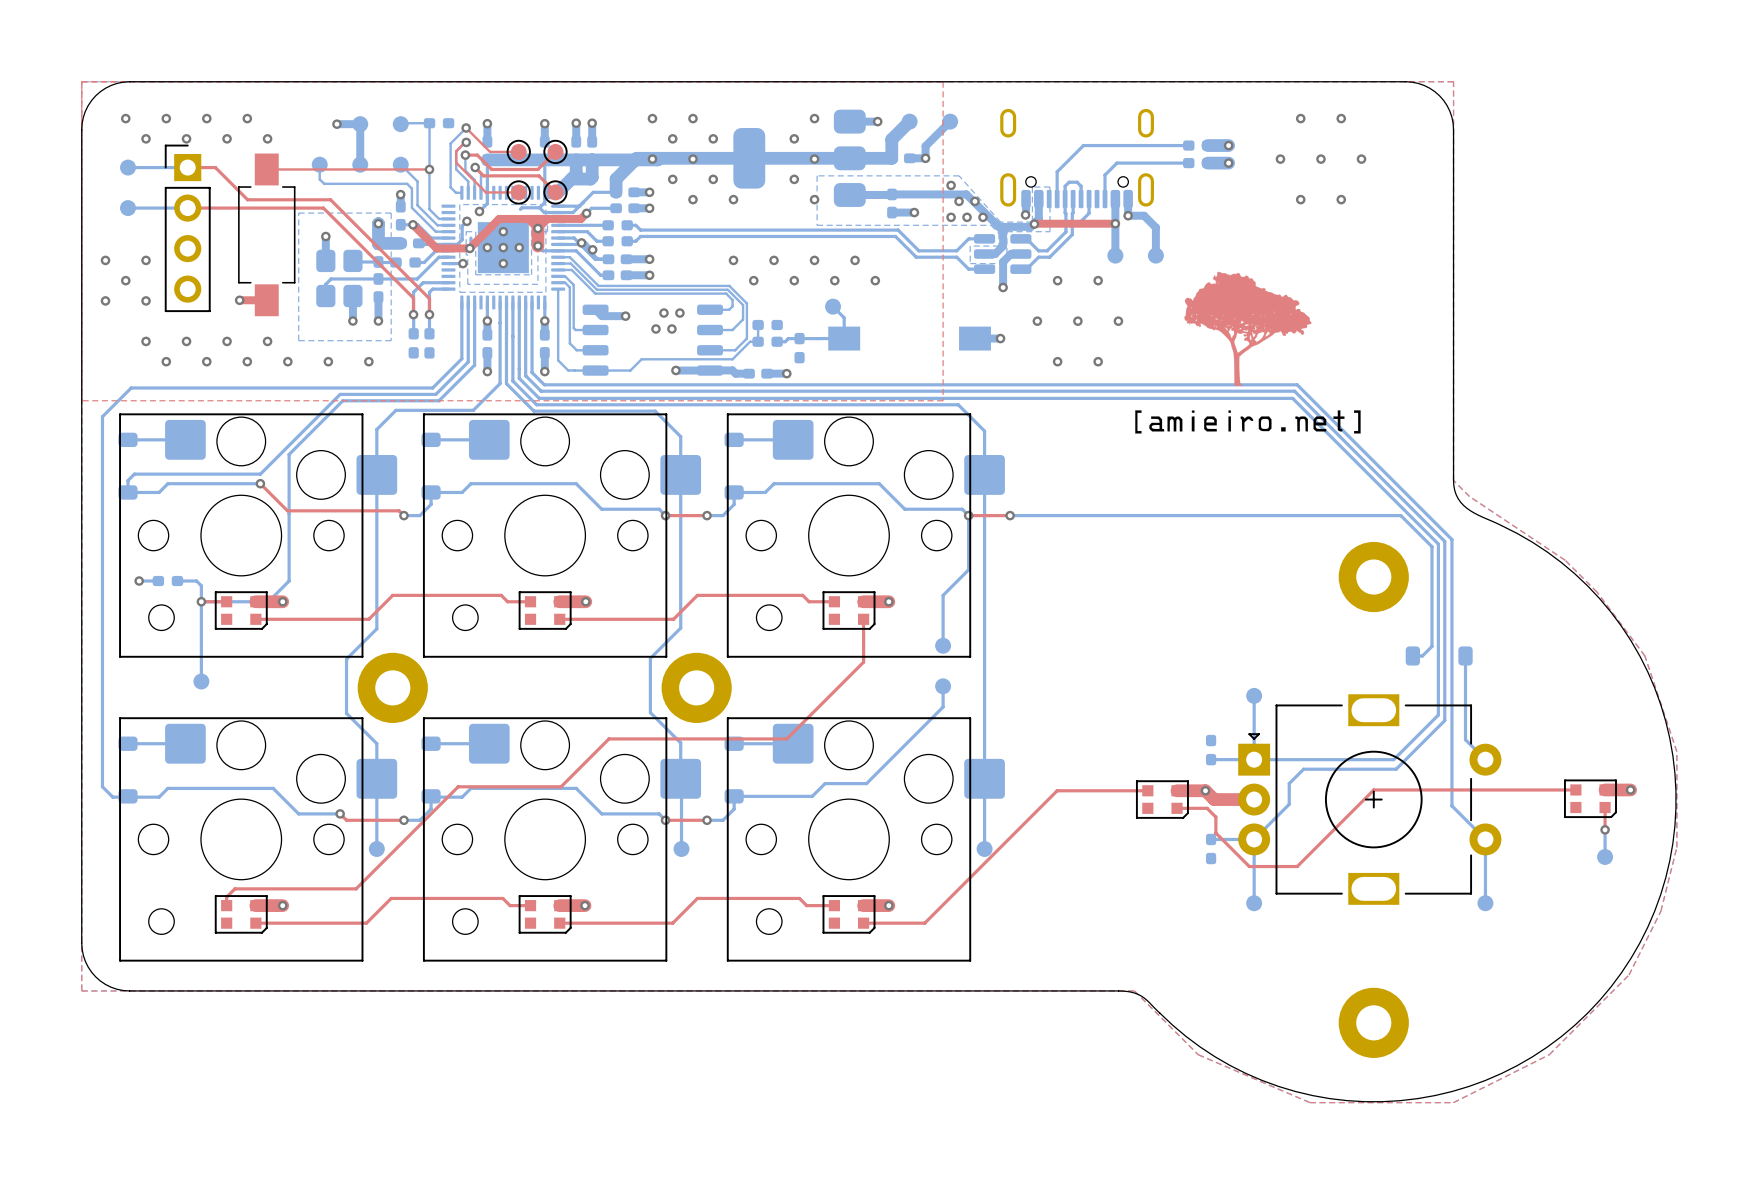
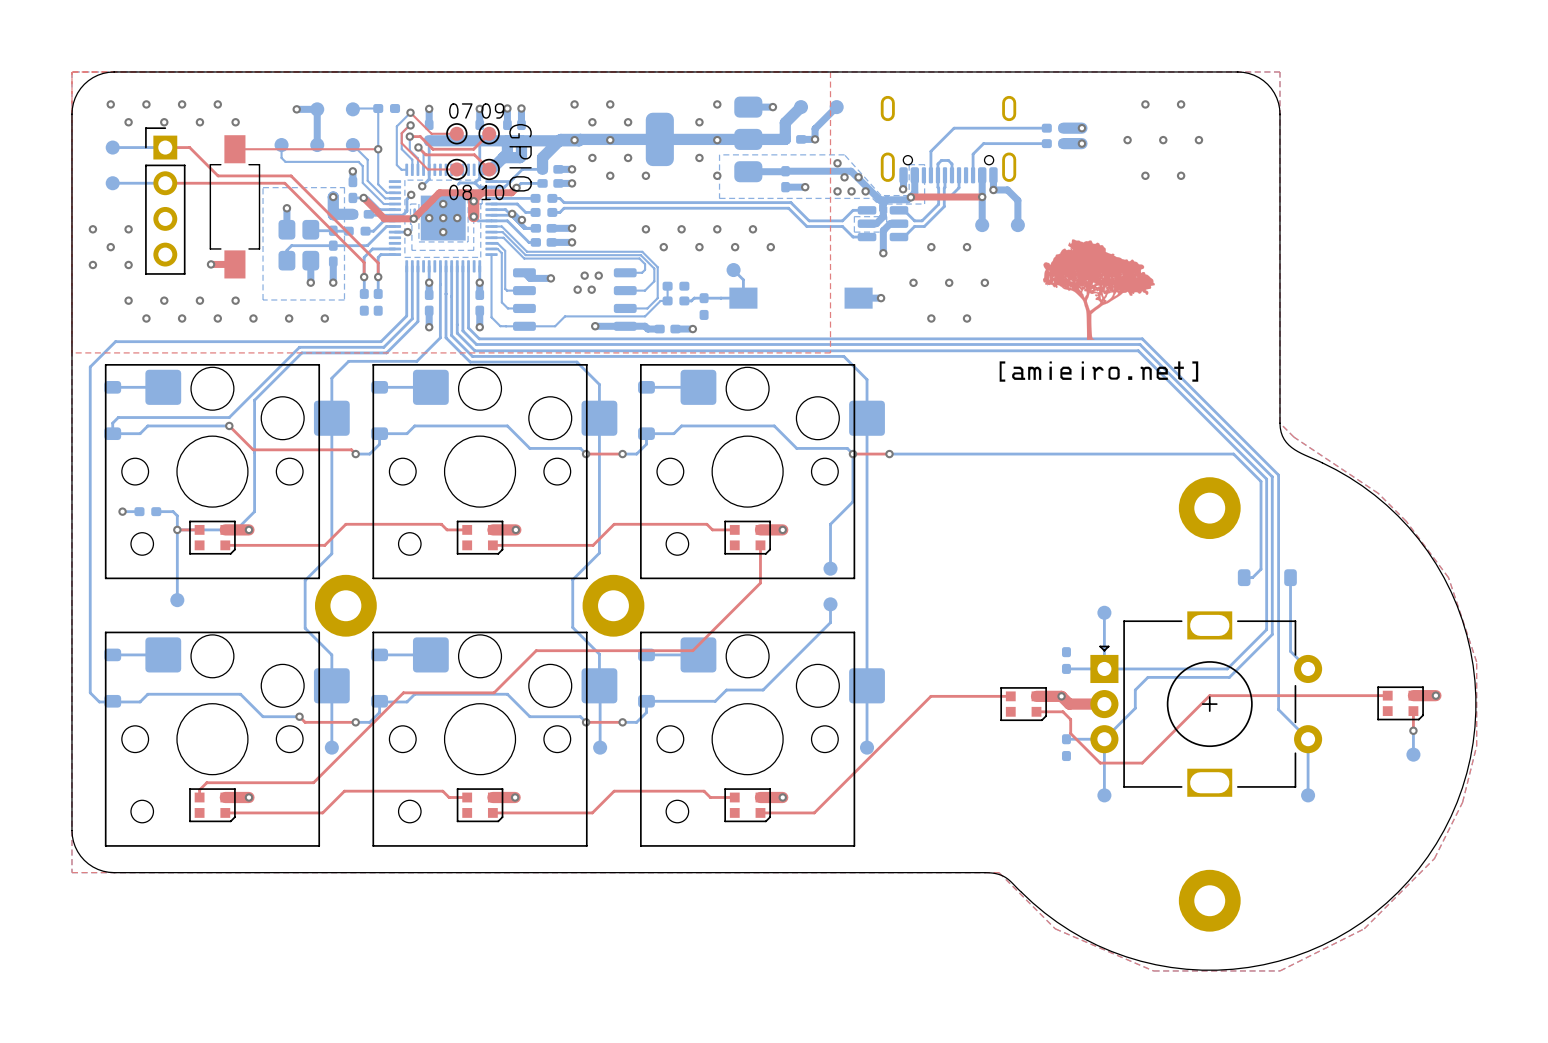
text: none -> 07 (460, 111)
text: none -> 09 (492, 111)
text: none -> GPIO (520, 157)
text: none -> 08 (460, 192)
text: none -> 10 (492, 192)

